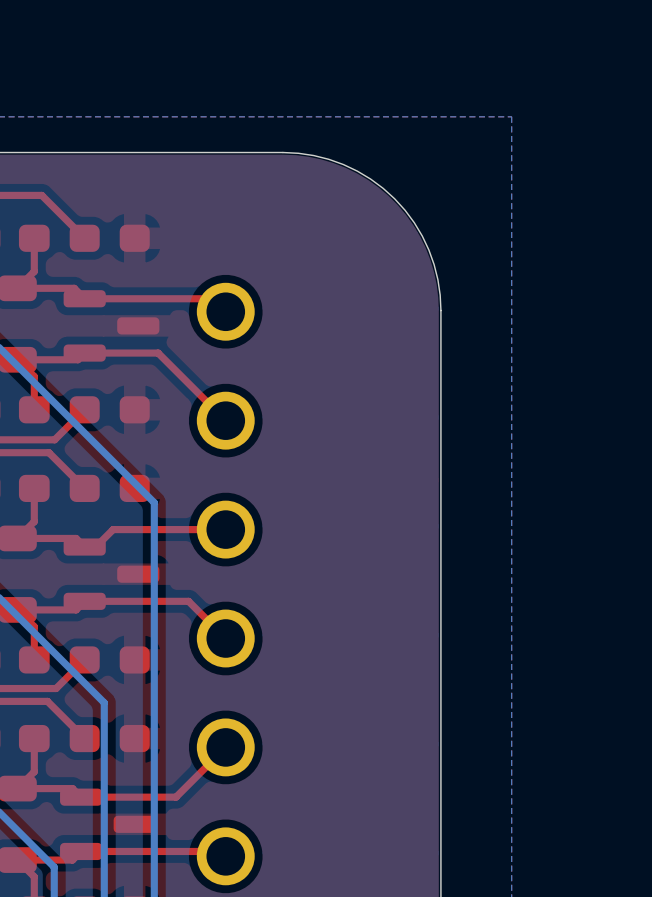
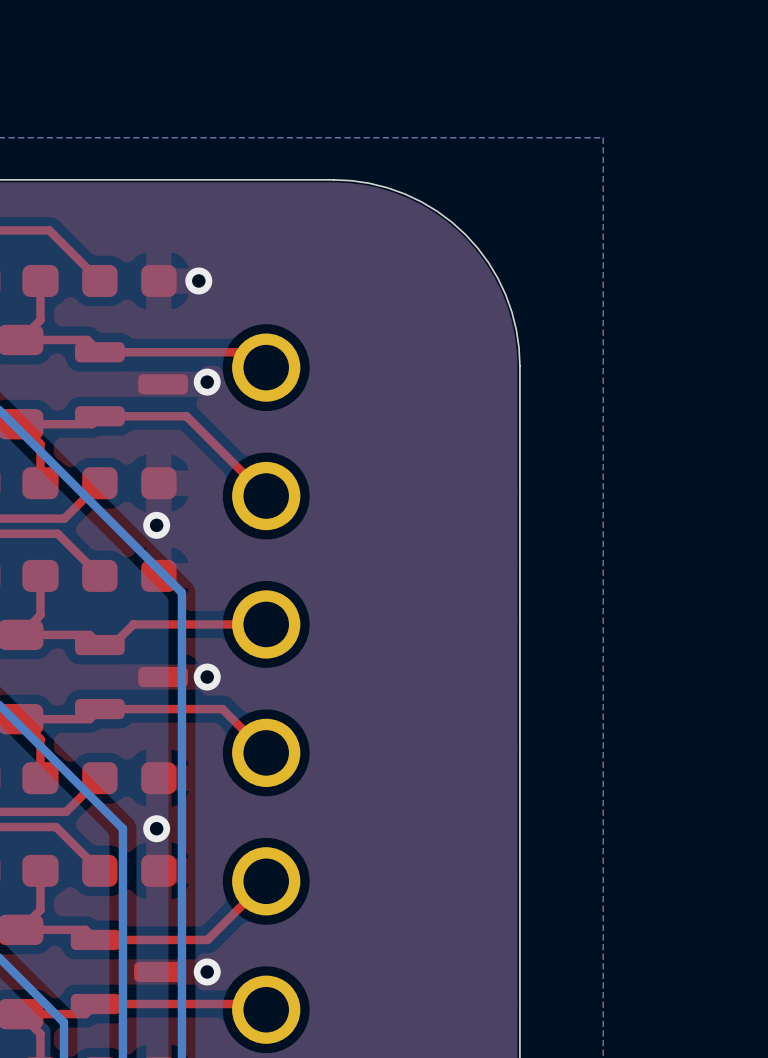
via: none -> (198, 280)
via: none -> (207, 382)
via: none -> (156, 525)
via: none -> (207, 677)
via: none -> (156, 828)
via: none -> (207, 971)

